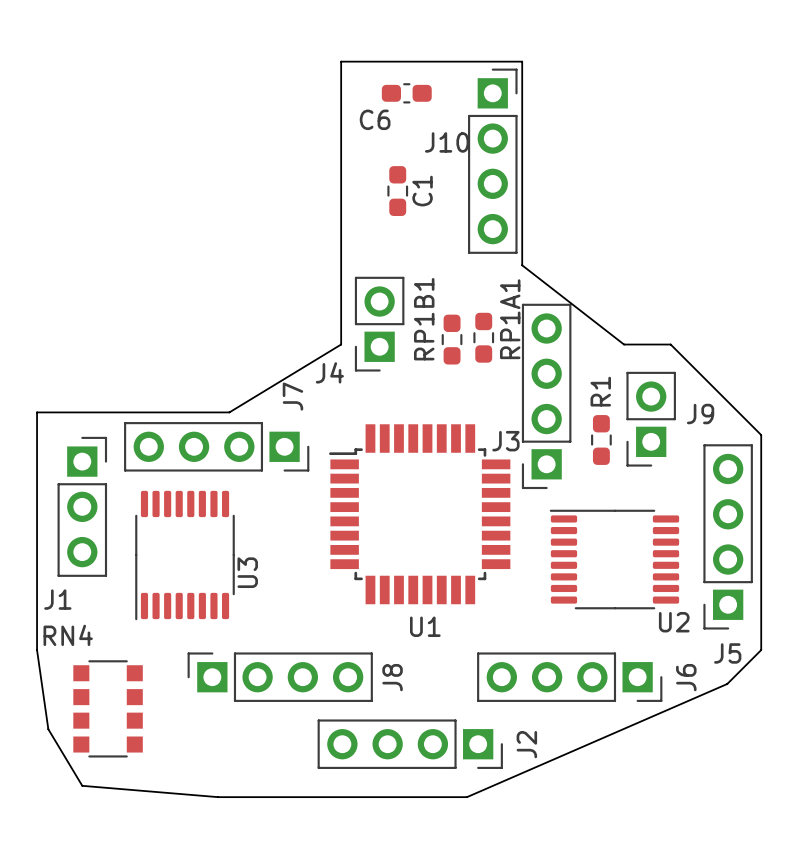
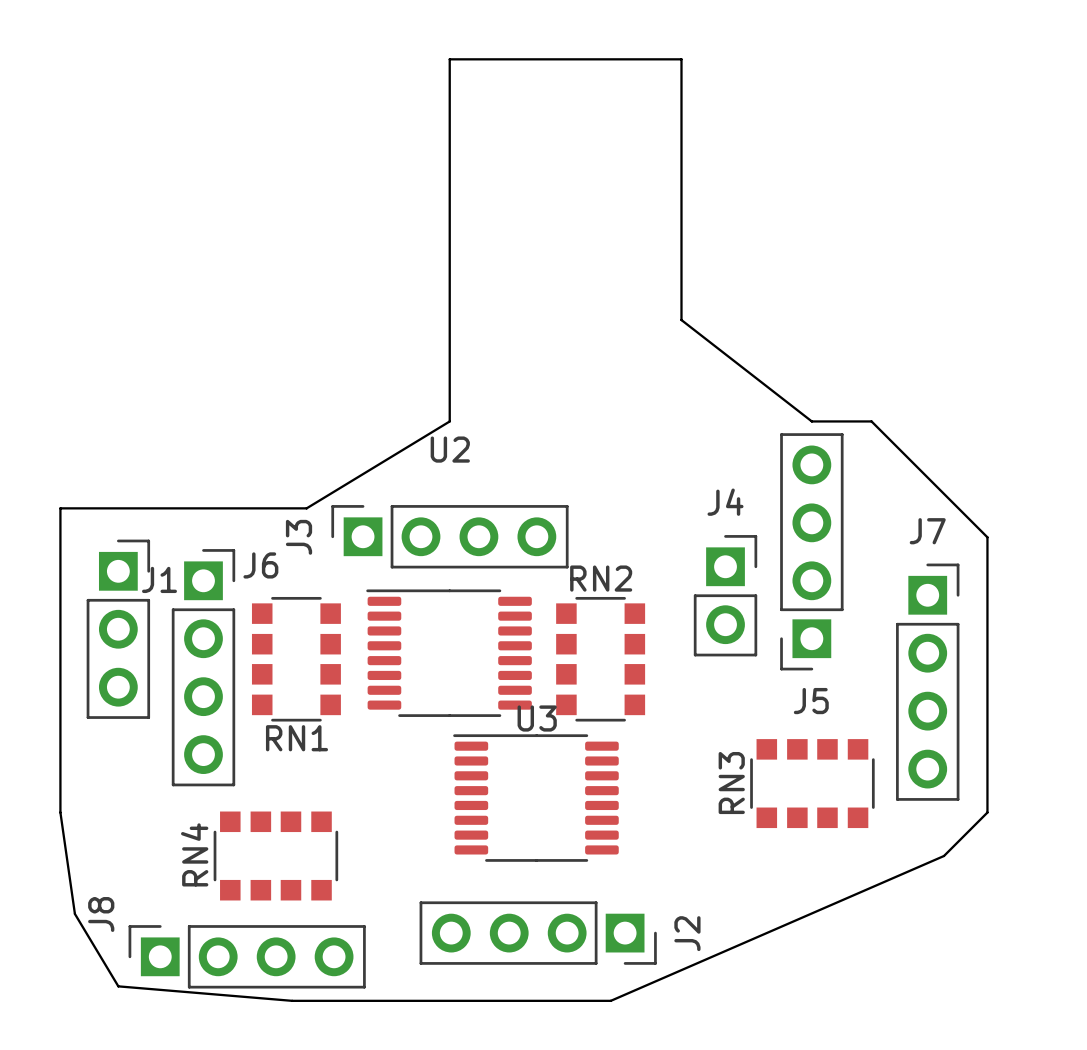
C6: (406, 93) -> none
J10: (492, 161) -> none
C1: (397, 191) -> none
J4 rotation: 0° (379, 324) -> 180° (725, 595)
J4 position: (379, 324) -> (725, 595)
RP1A1: (483, 337) -> none
RP1B1: (452, 339) -> none
J4 name position: J4 (329, 372) -> J4 (725, 502)
J7 name position: J7 (292, 396) -> J7 (927, 531)
J3 rotation: 0° (546, 396) -> 90° clockwise (449, 536)
J3 position: (546, 396) -> (449, 536)
J9: (651, 419) -> none
R1: (601, 439) -> none
J3 name position: J3 (505, 441) -> J3 (299, 537)
J7 rotation: 0° (216, 446) -> 90° counterclockwise (927, 682)
J7 position: (216, 446) -> (927, 682)
U1: (419, 514) -> none
RN1: none -> (296, 659)
RN2: none -> (600, 659)
J5 position: (728, 536) -> (811, 551)
U3 rotation: 0° (185, 555) -> 90° clockwise (535, 798)
U3 position: (185, 555) -> (535, 798)
U2 position: (614, 559) -> (449, 653)
U3 name position: U3 (247, 572) -> U3 (537, 718)
J1 name position: J1 (57, 599) -> J1 (159, 579)
U2 name position: U2 (674, 622) -> U2 (450, 449)
RN3: none -> (812, 783)
RN4 name position: RN4 (68, 635) -> RN4 (194, 854)
J8 position: (280, 677) -> (247, 956)
J8 name position: J8 (392, 677) -> J8 (101, 914)
J6 rotation: 0° (569, 677) -> 90° counterclockwise (203, 667)
J6 position: (569, 677) -> (203, 667)
J6 name position: J6 (686, 677) -> J6 (260, 565)
RN4 rotation: 0° (108, 708) -> 90° clockwise (275, 855)
RN4 position: (108, 708) -> (275, 855)

